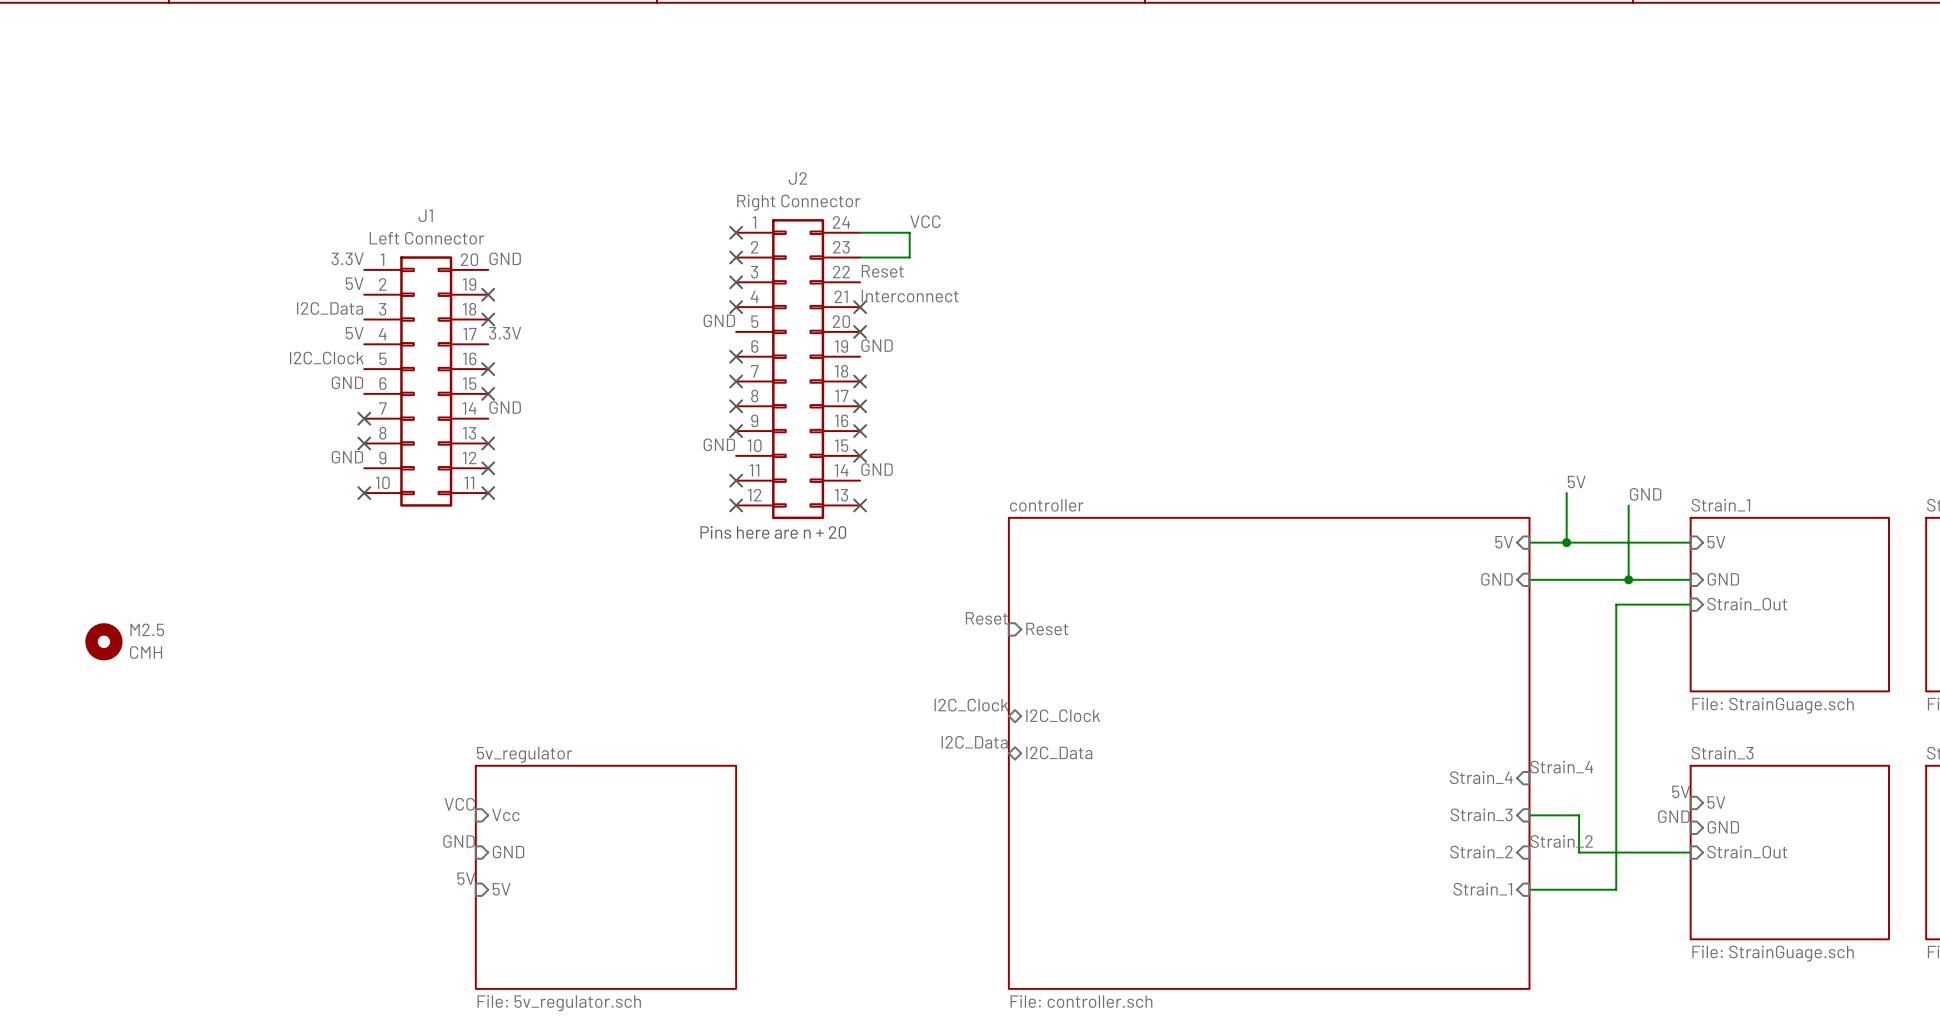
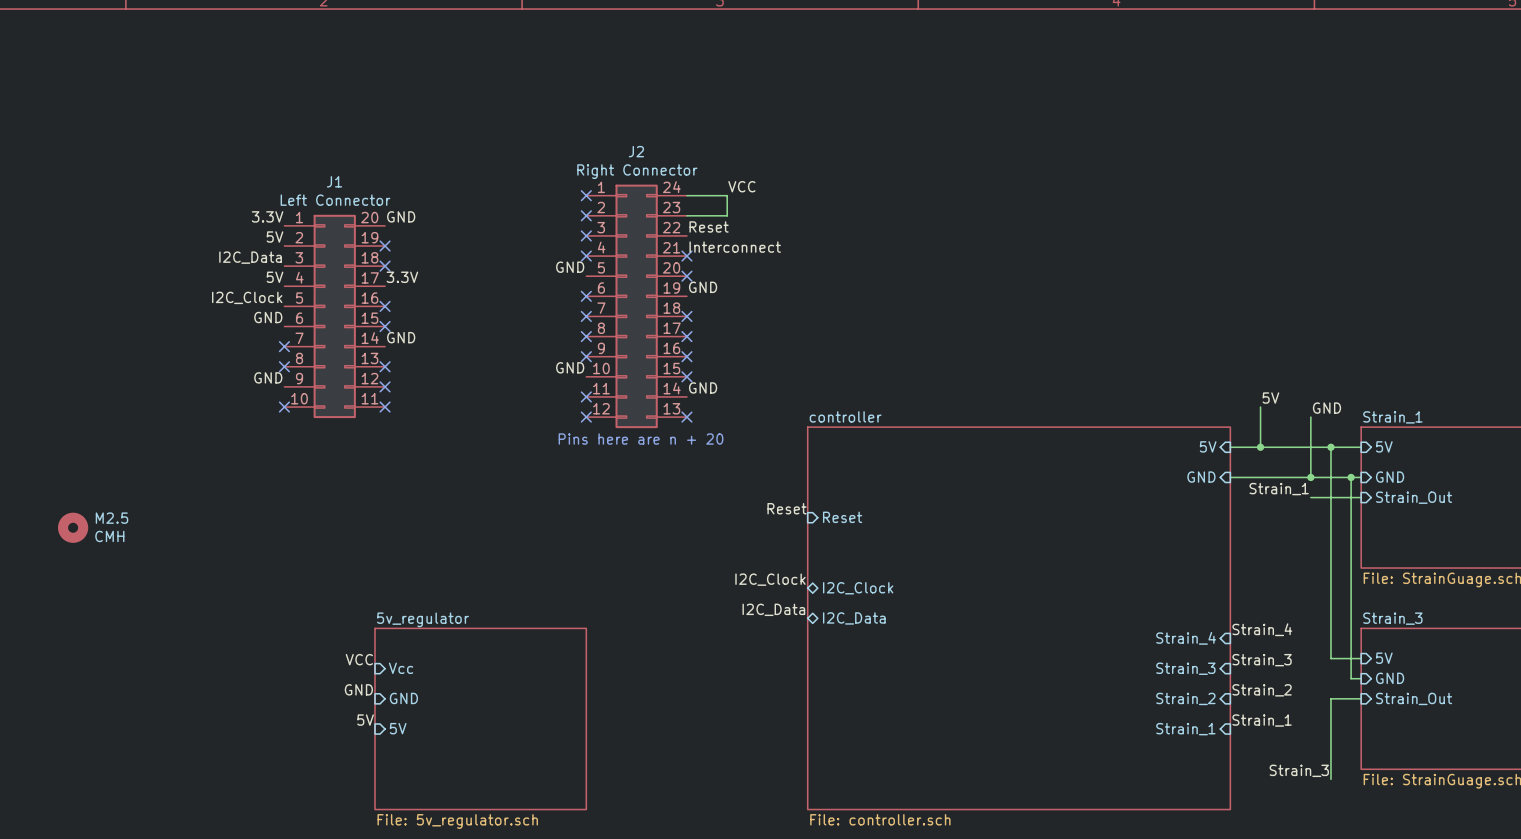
wire: none -> (1330, 447) (1330, 658) (1361, 658)
junction: none -> (1330, 447)
wire: none -> (1351, 477) (1351, 678) (1361, 678)
junction: none -> (1351, 477)
label: none -> Strain_1 (1279, 489)
wire: (1628, 604) (1616, 604) (1616, 889) (1529, 889) -> none
label: 5V (1681, 791) -> none
label: none -> Strain_3 (1262, 660)
wire: (1529, 815) (1579, 815) (1579, 852) (1653, 852) -> (1330, 779) (1330, 698)
label: GND (1673, 816) -> none
label: none -> Strain_1 (1262, 720)
label: none -> Strain_3 (1299, 770)

